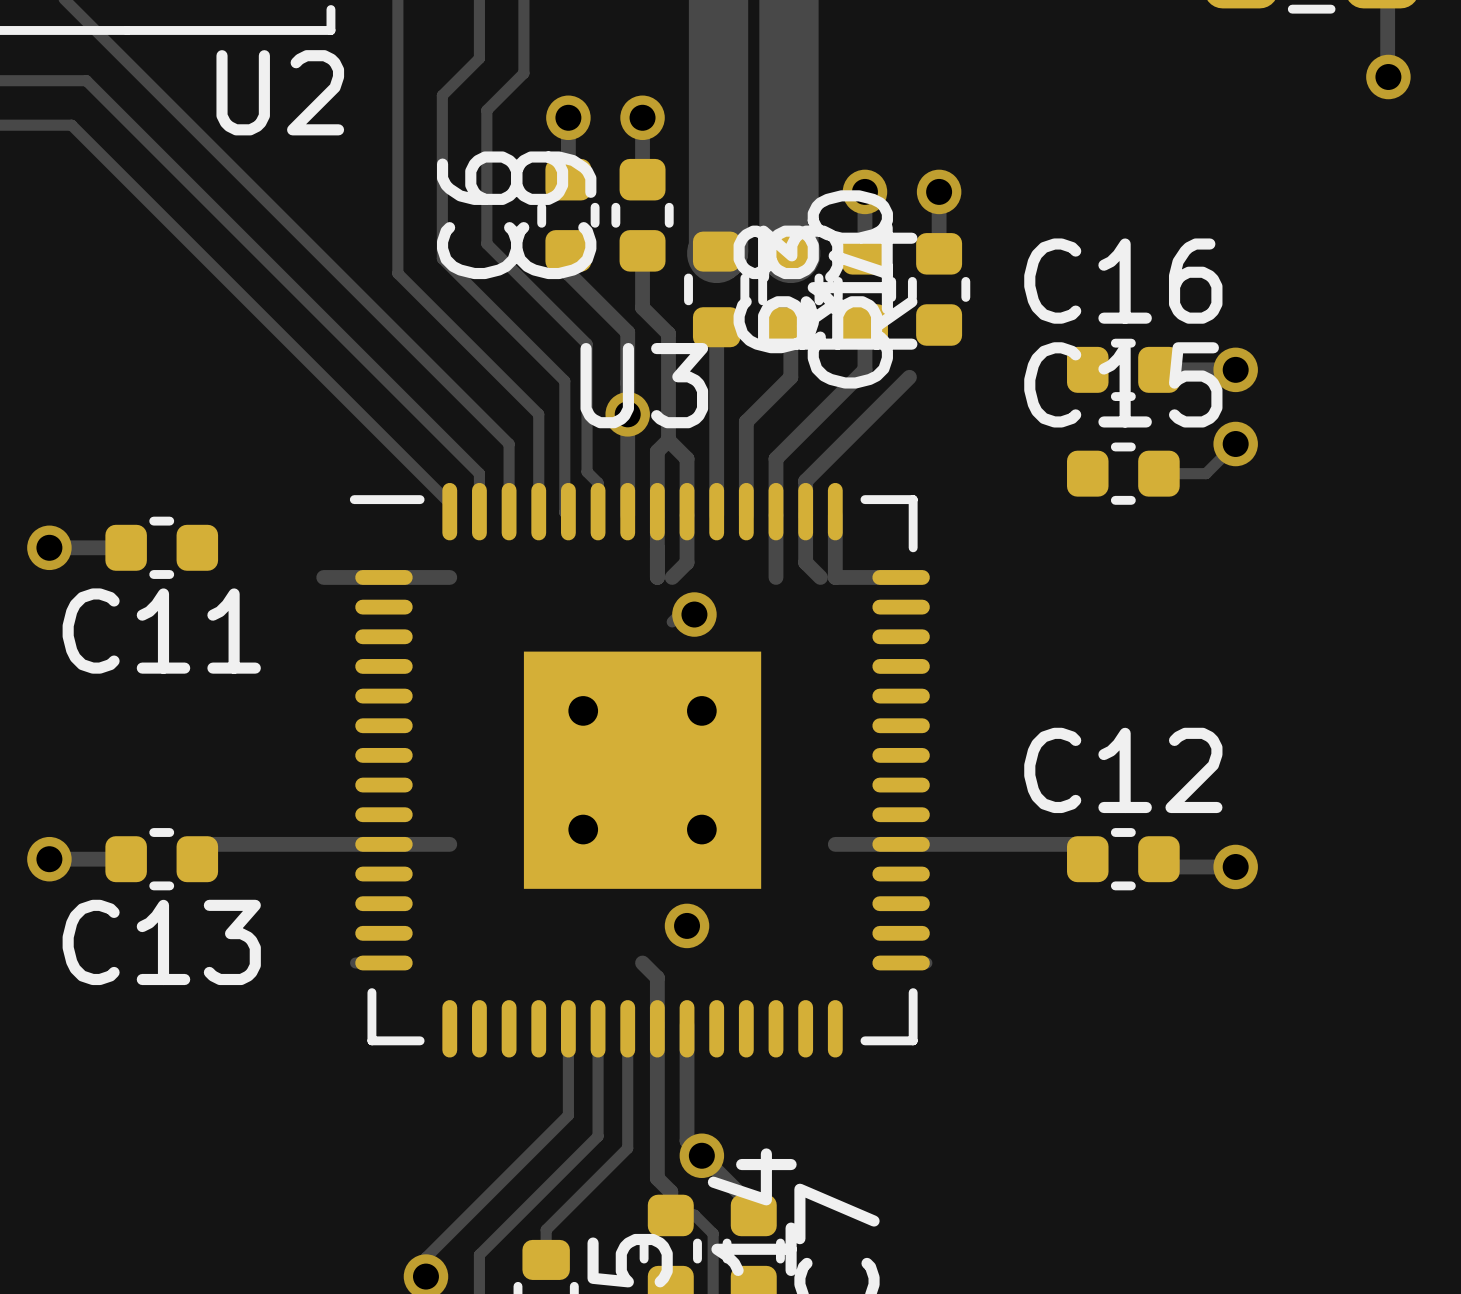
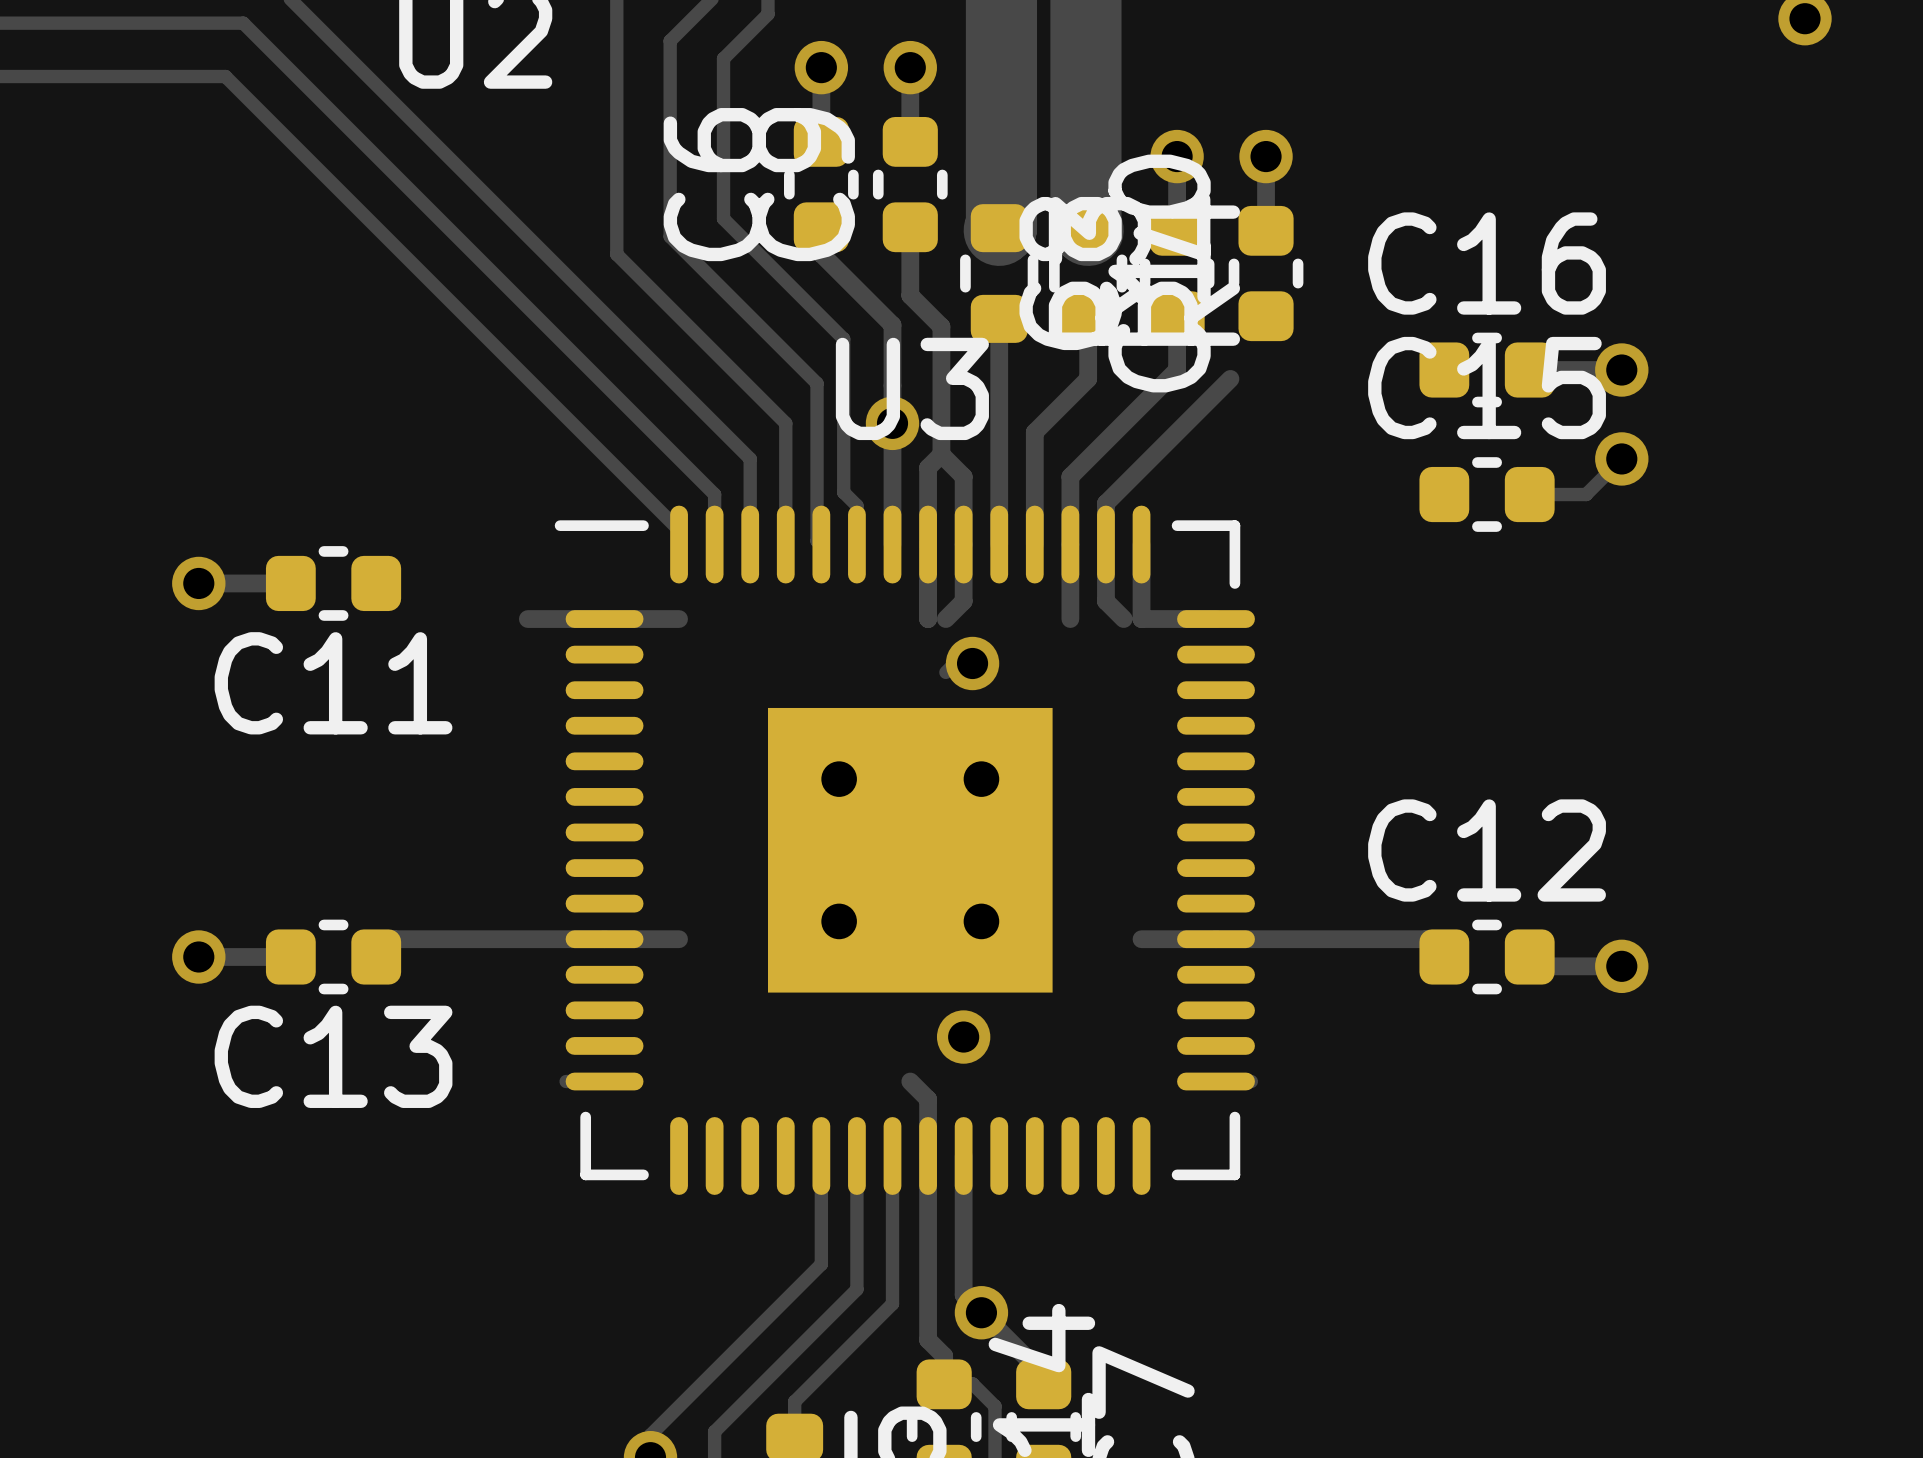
U3 footprint: [349, 482, 930, 1058] -> [554, 505, 1255, 1195]

